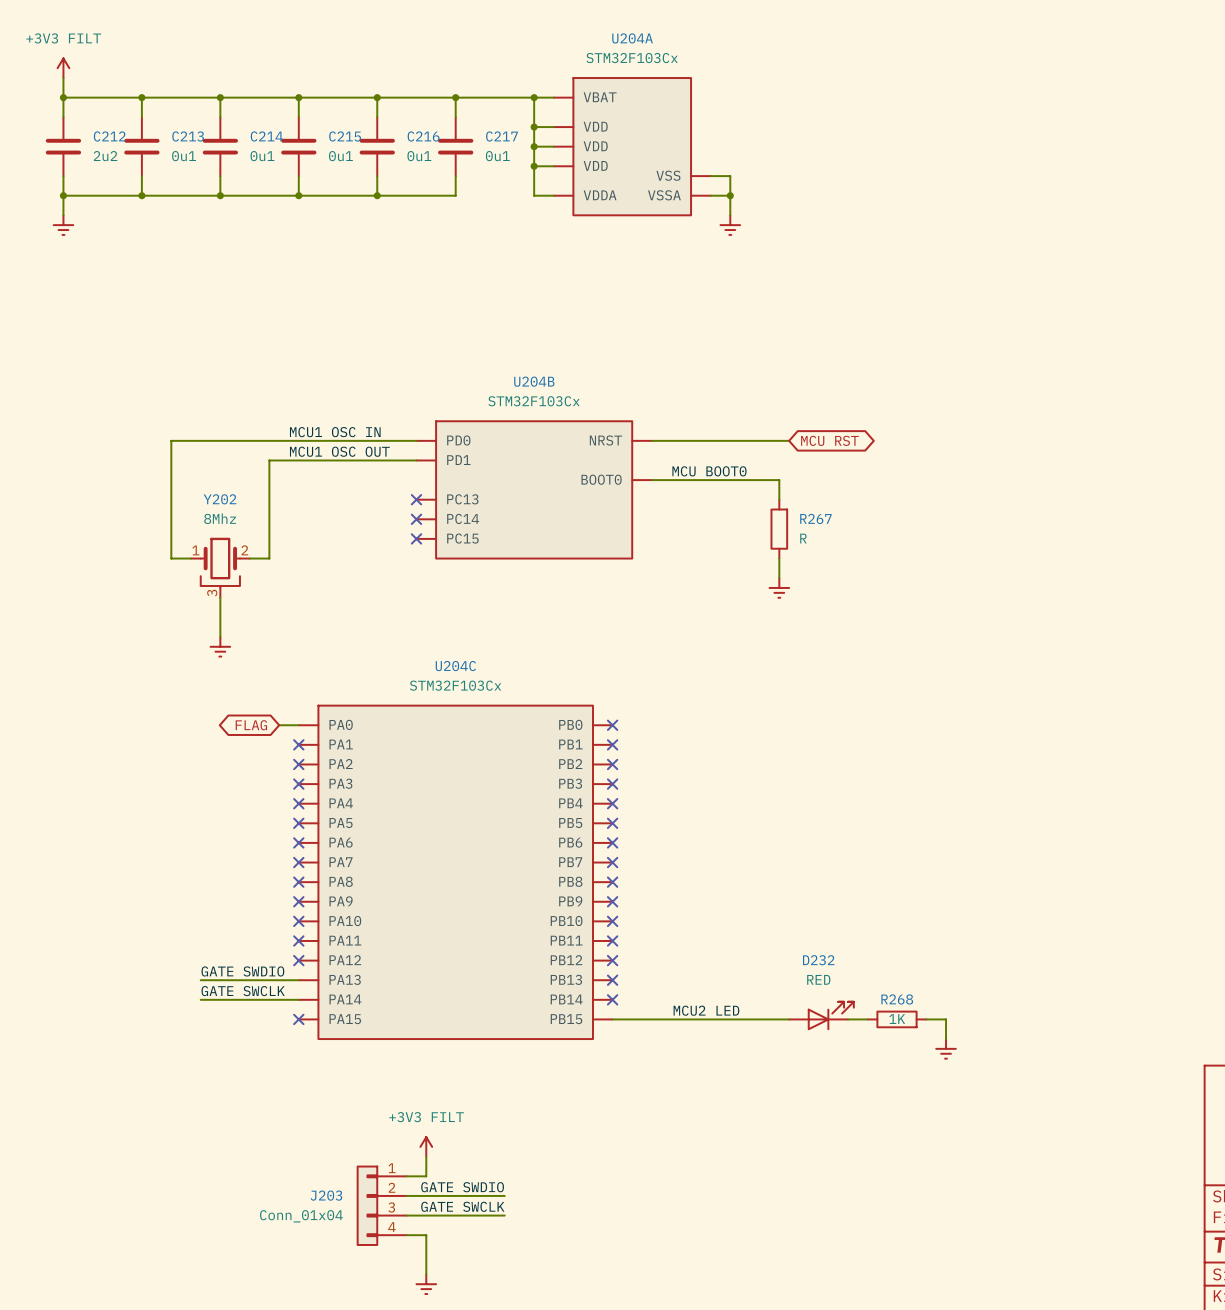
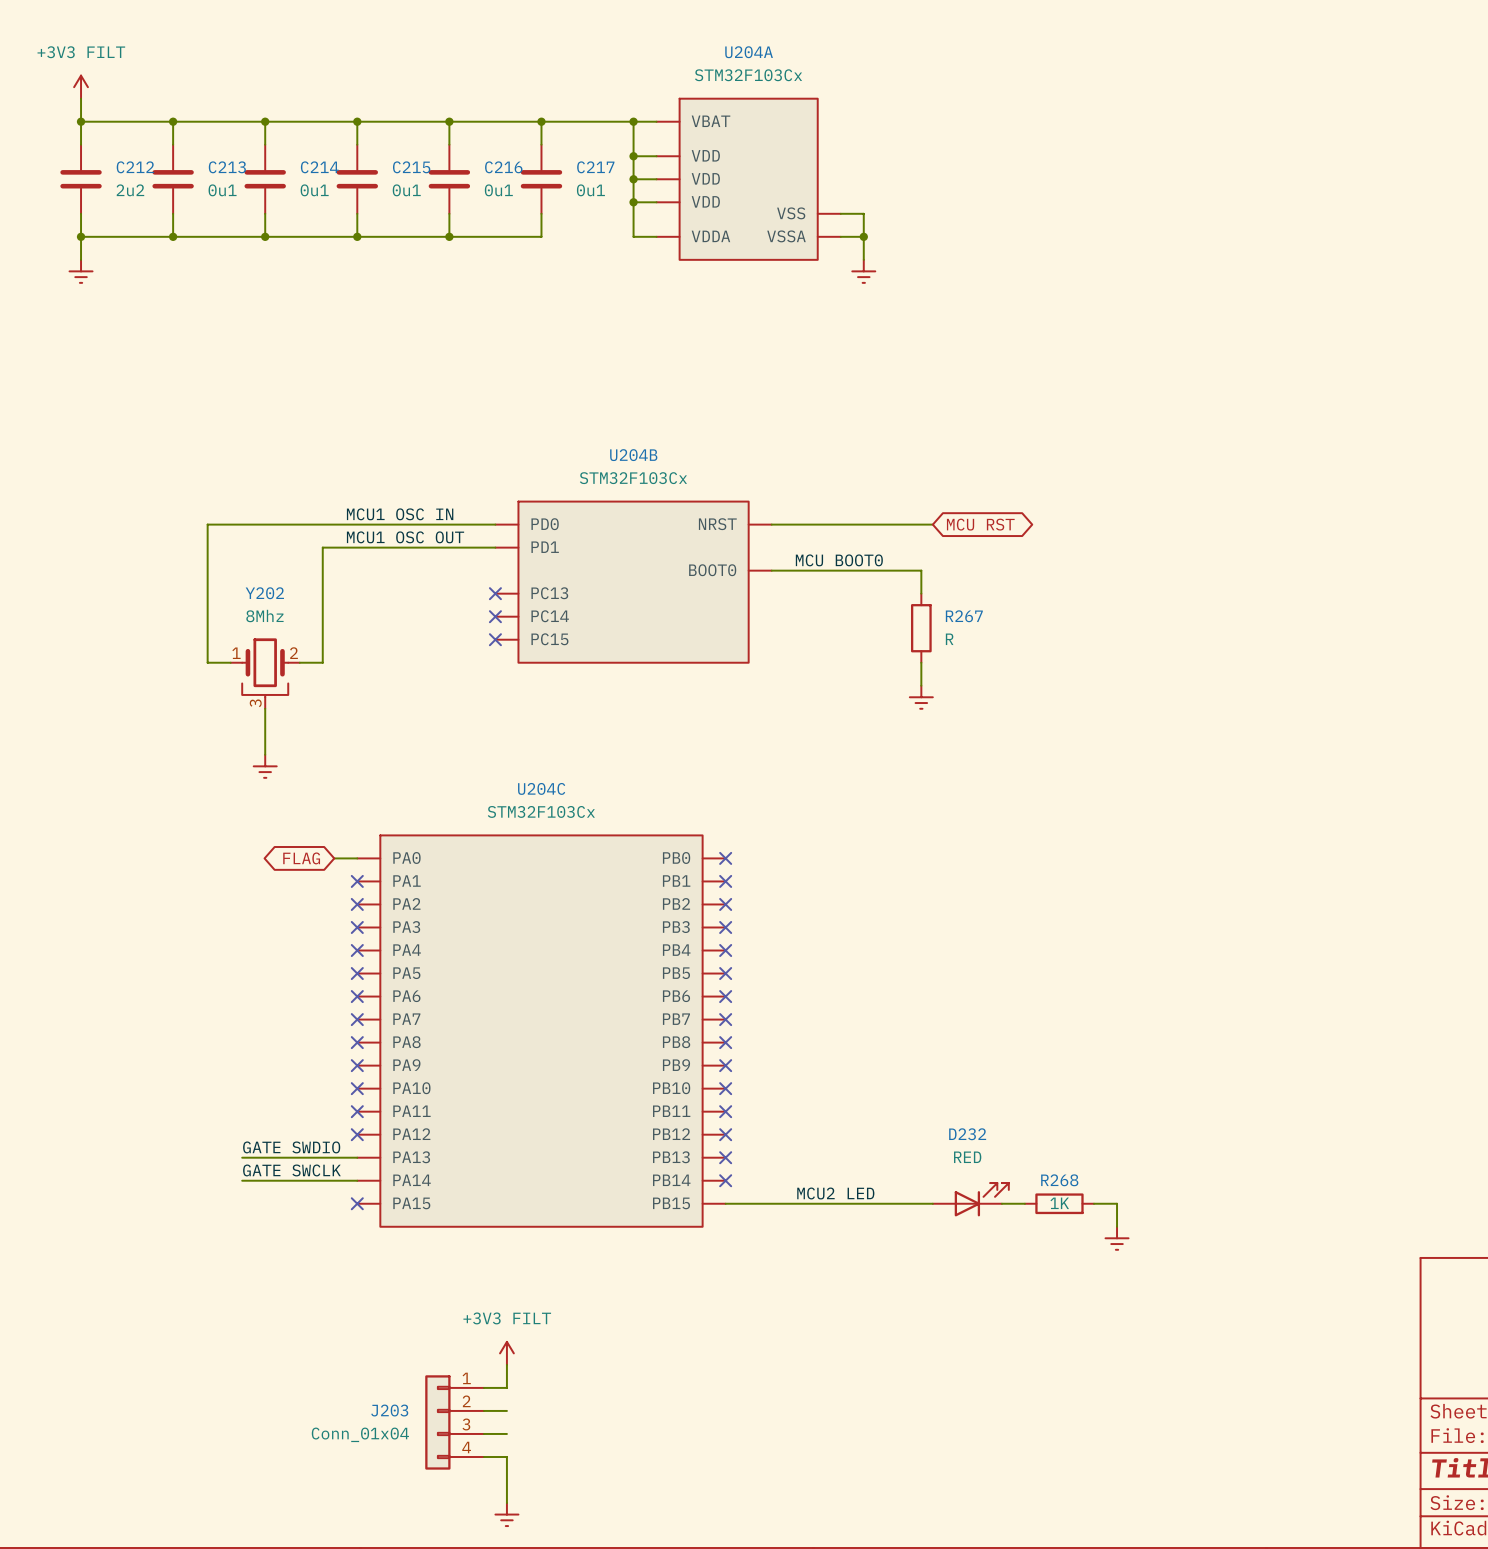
label: GATE SWDIO (462, 1187) -> none
wire: (426, 1195) (504, 1195) -> none
label: GATE SWCLK (462, 1206) -> none
wire: (426, 1215) (504, 1215) -> none

